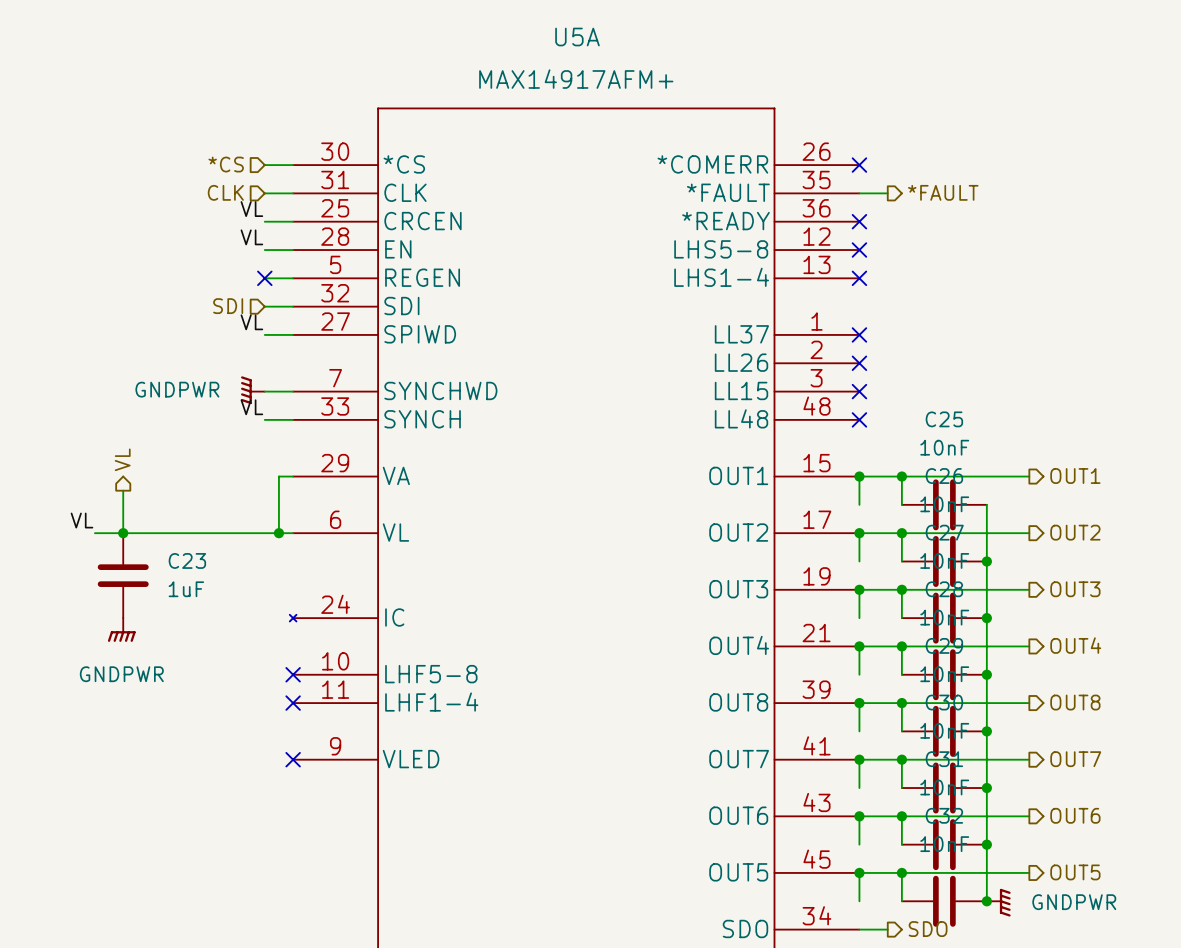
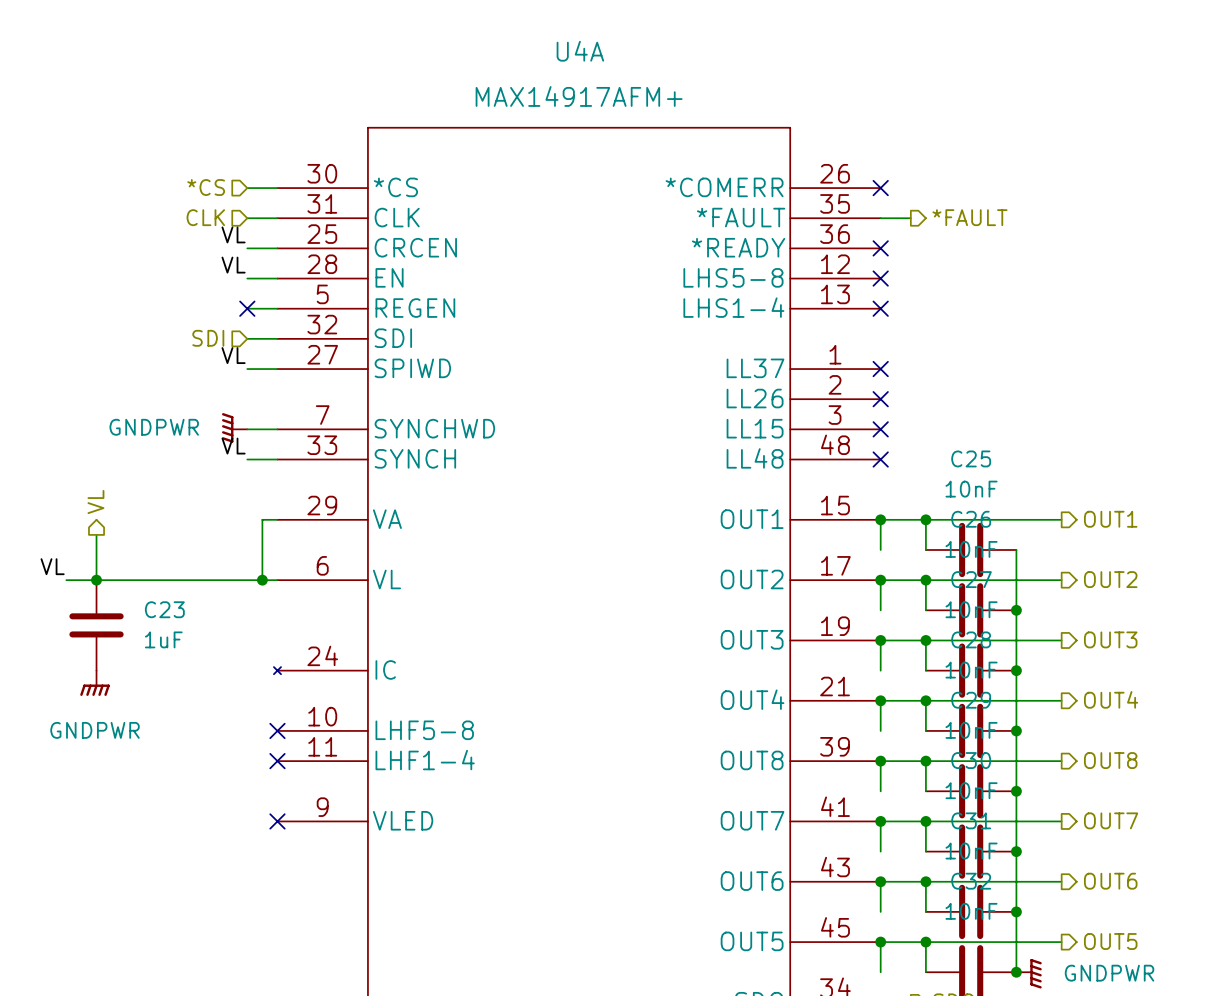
U5A name: U5A (577, 37) -> U4A (580, 51)

